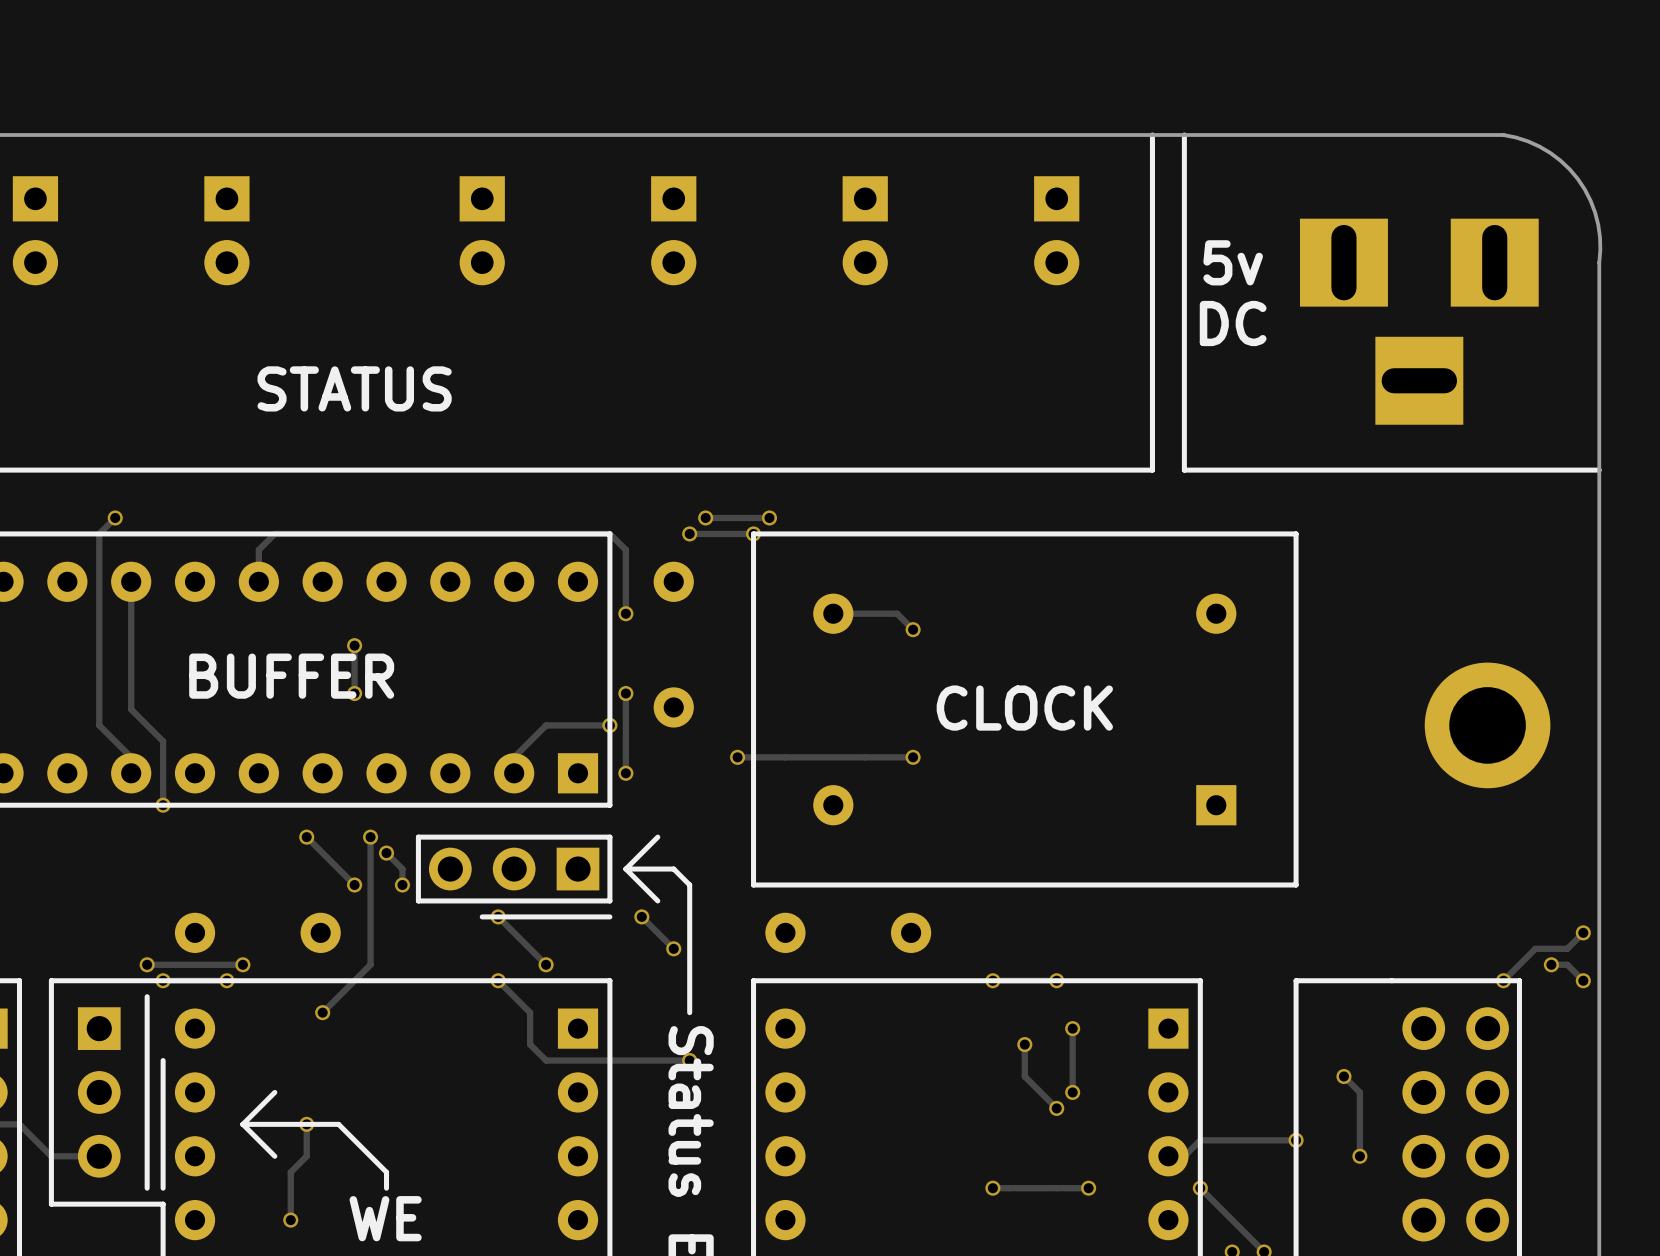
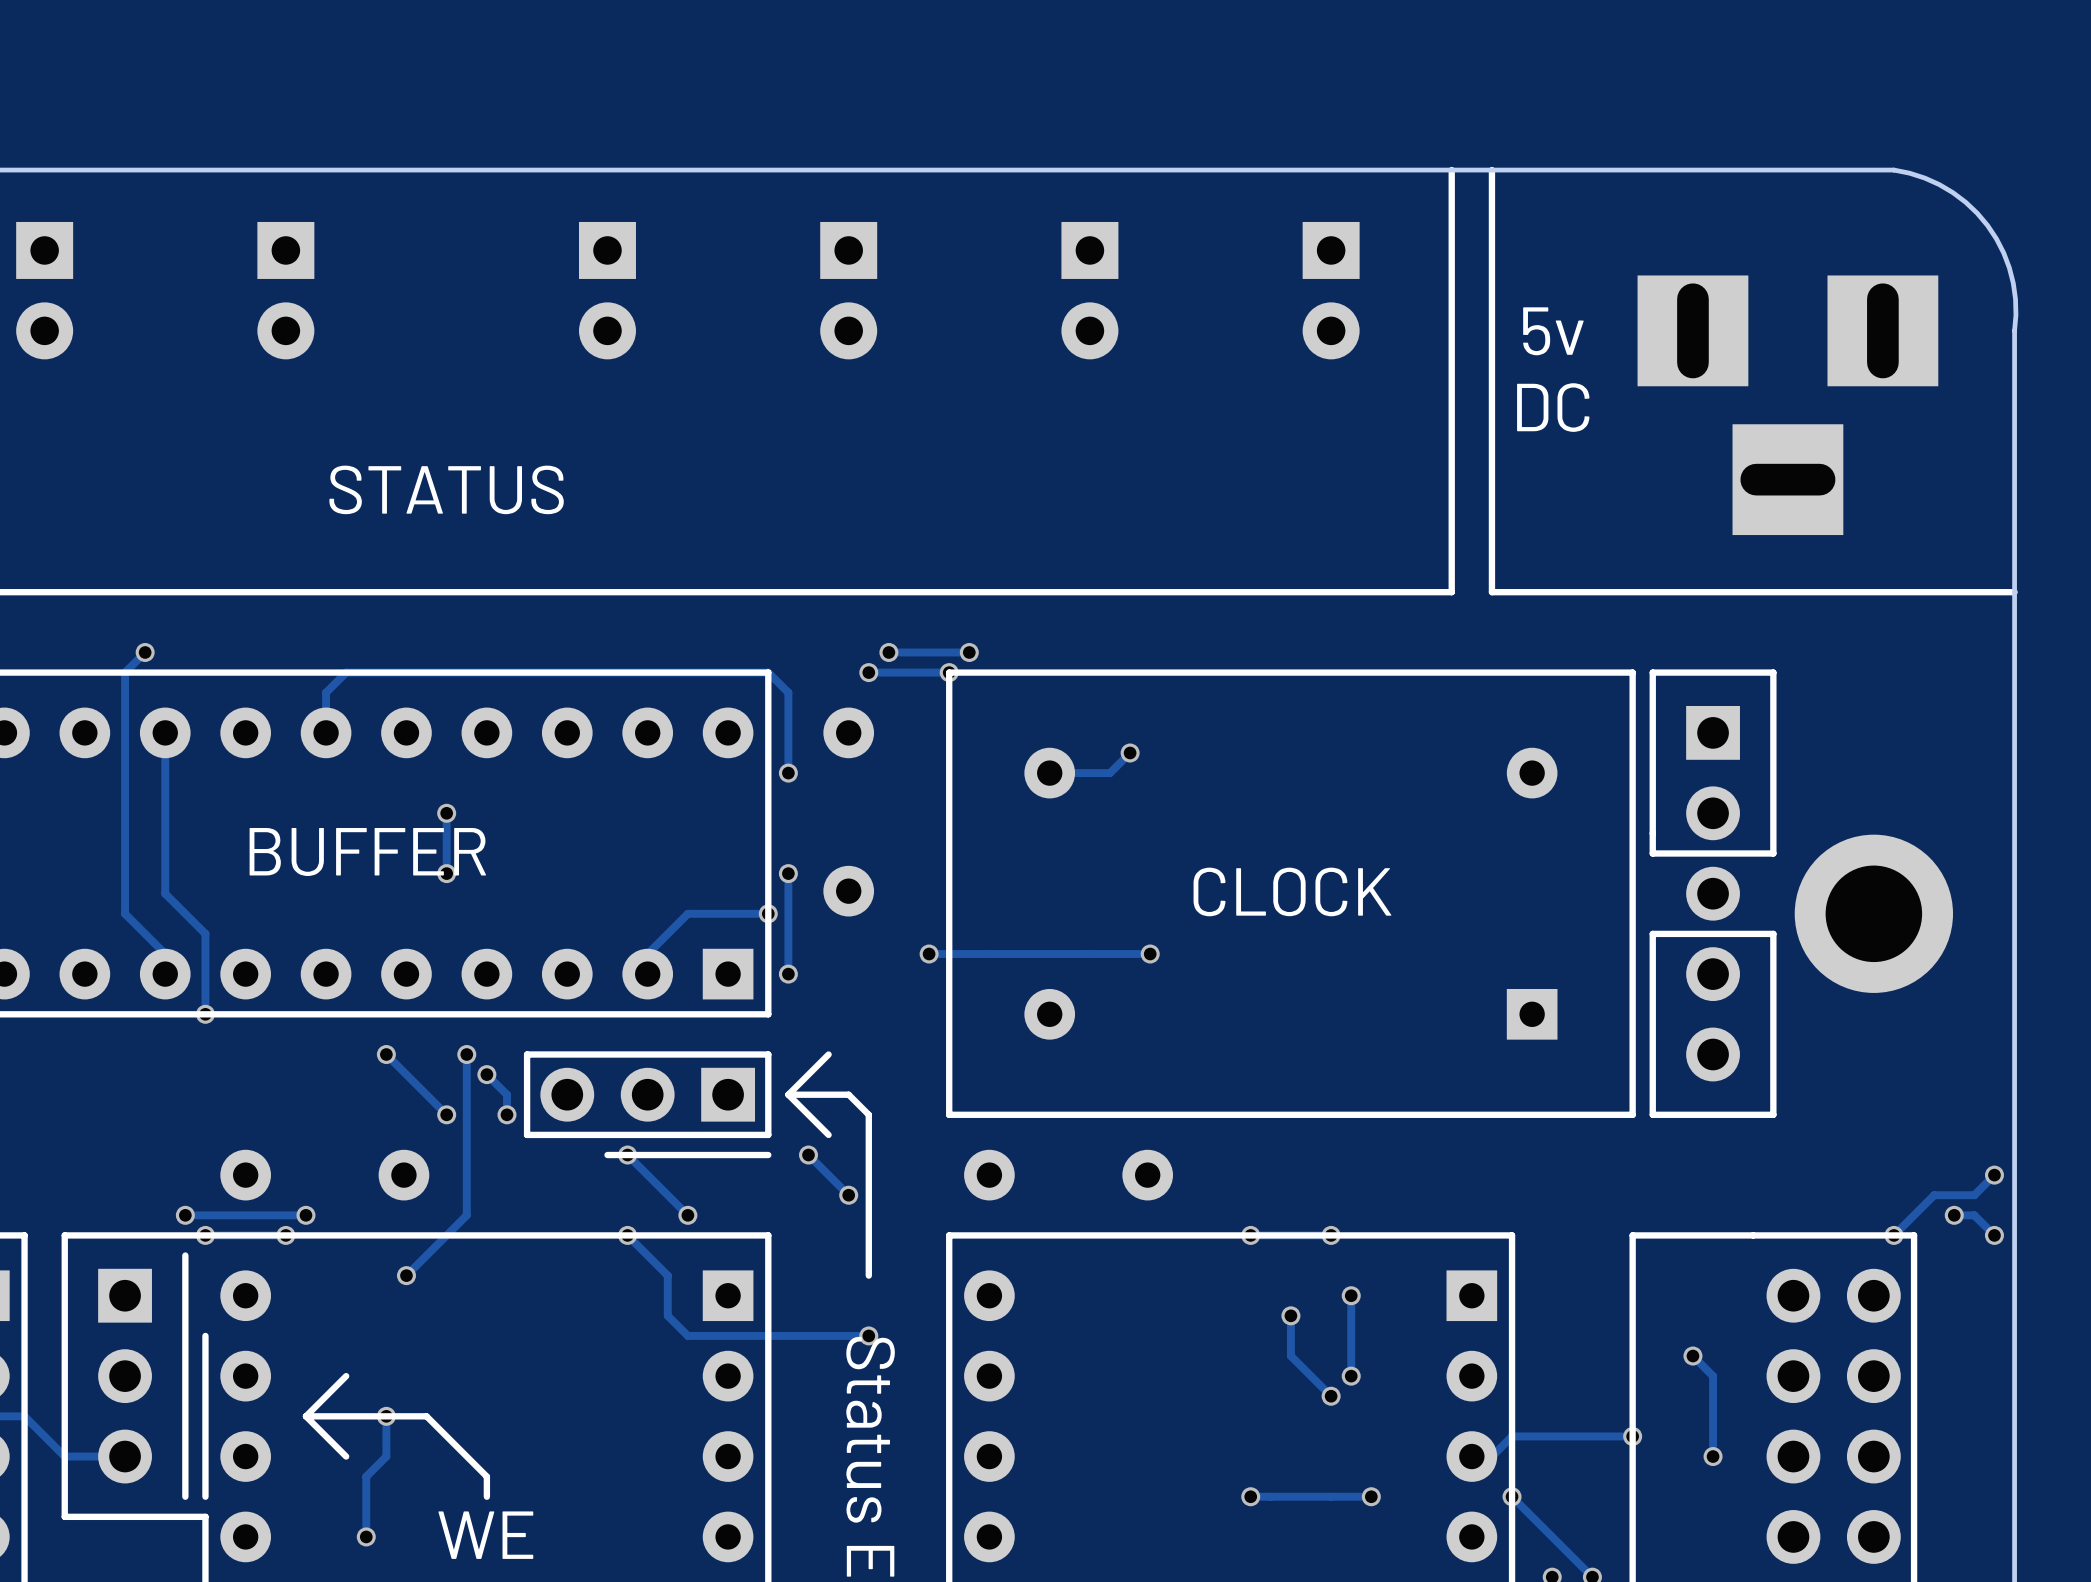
line: none -> (1773, 672) (1773, 853) (1652, 853) (1652, 672) (1773, 672)
track: (881, 613) (897, 613) (913, 629) -> (1110, 773) (1130, 752)
via position: (913, 629) -> (1130, 752)
part: none -> (1713, 893)
line: none -> (1773, 933) (1773, 1114) (1652, 1114) (1652, 933) (1773, 933)

